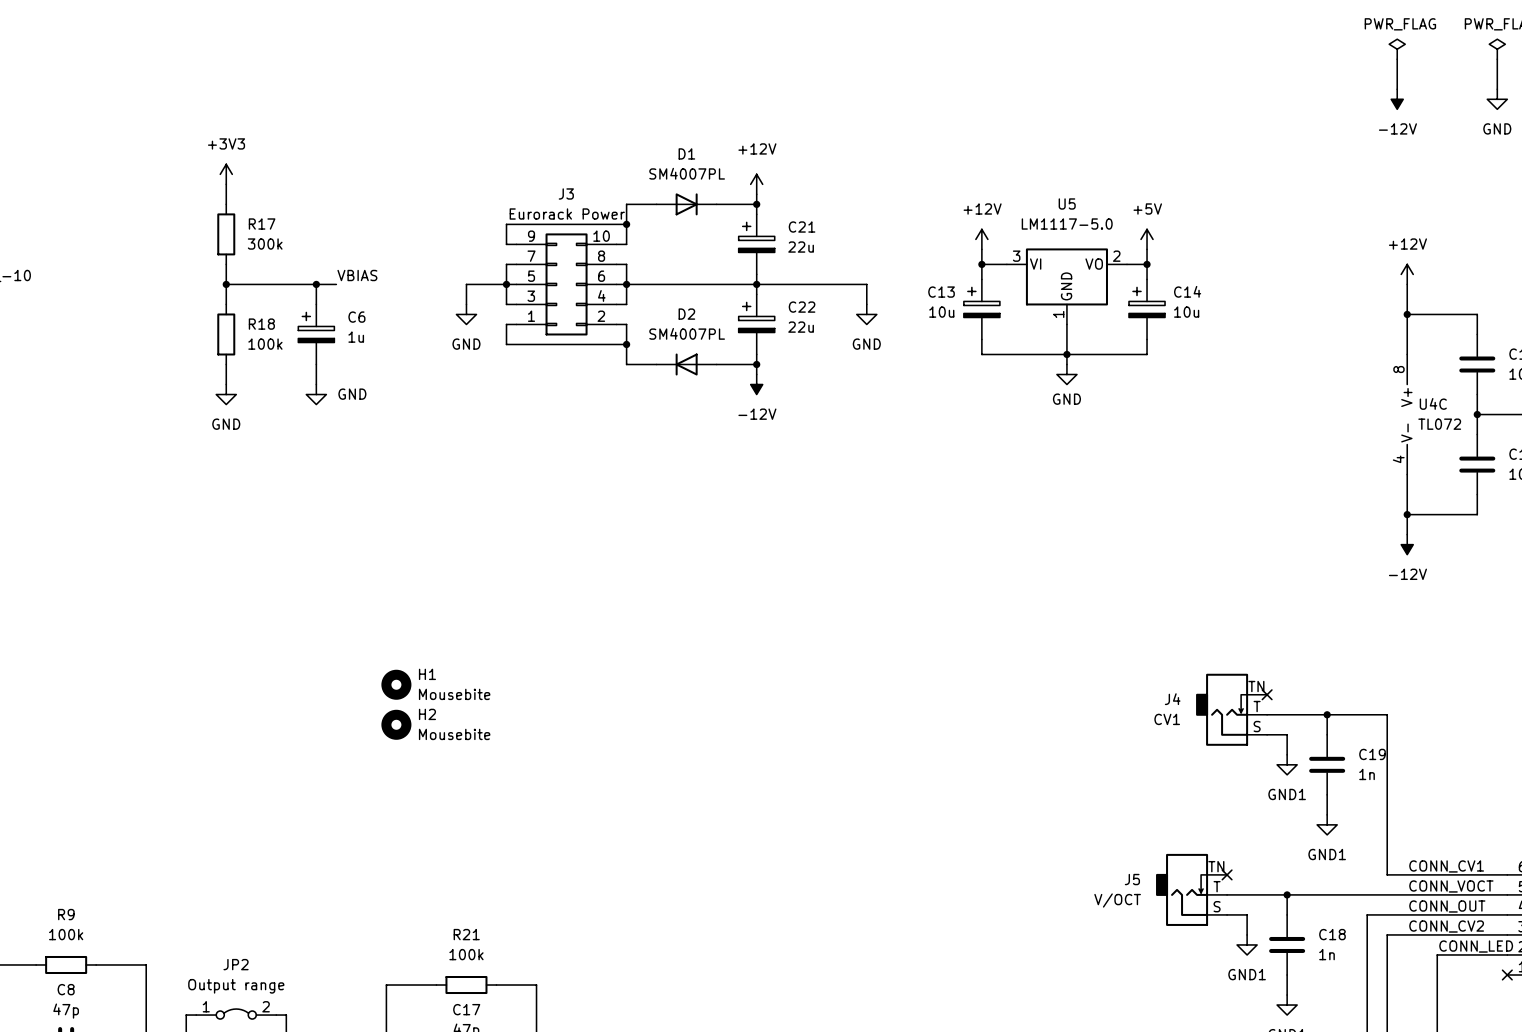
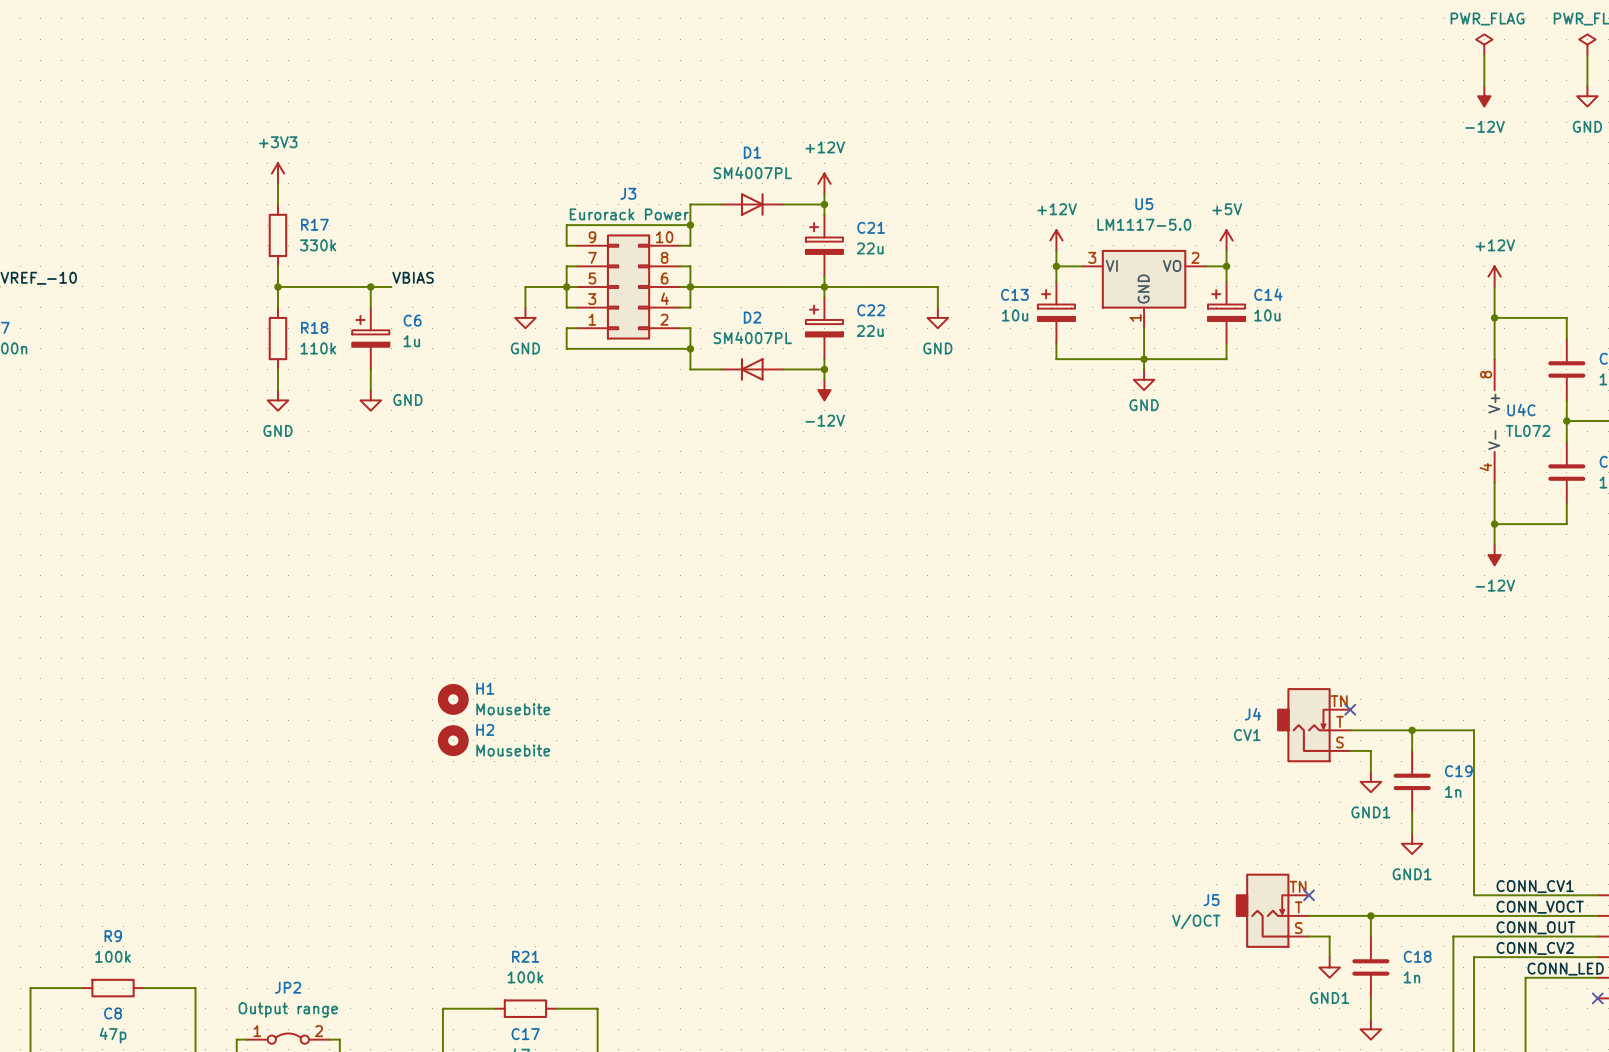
R17 value: 300k (265, 244) -> 330k (318, 245)
R18 value: 100k (265, 344) -> 110k (318, 348)

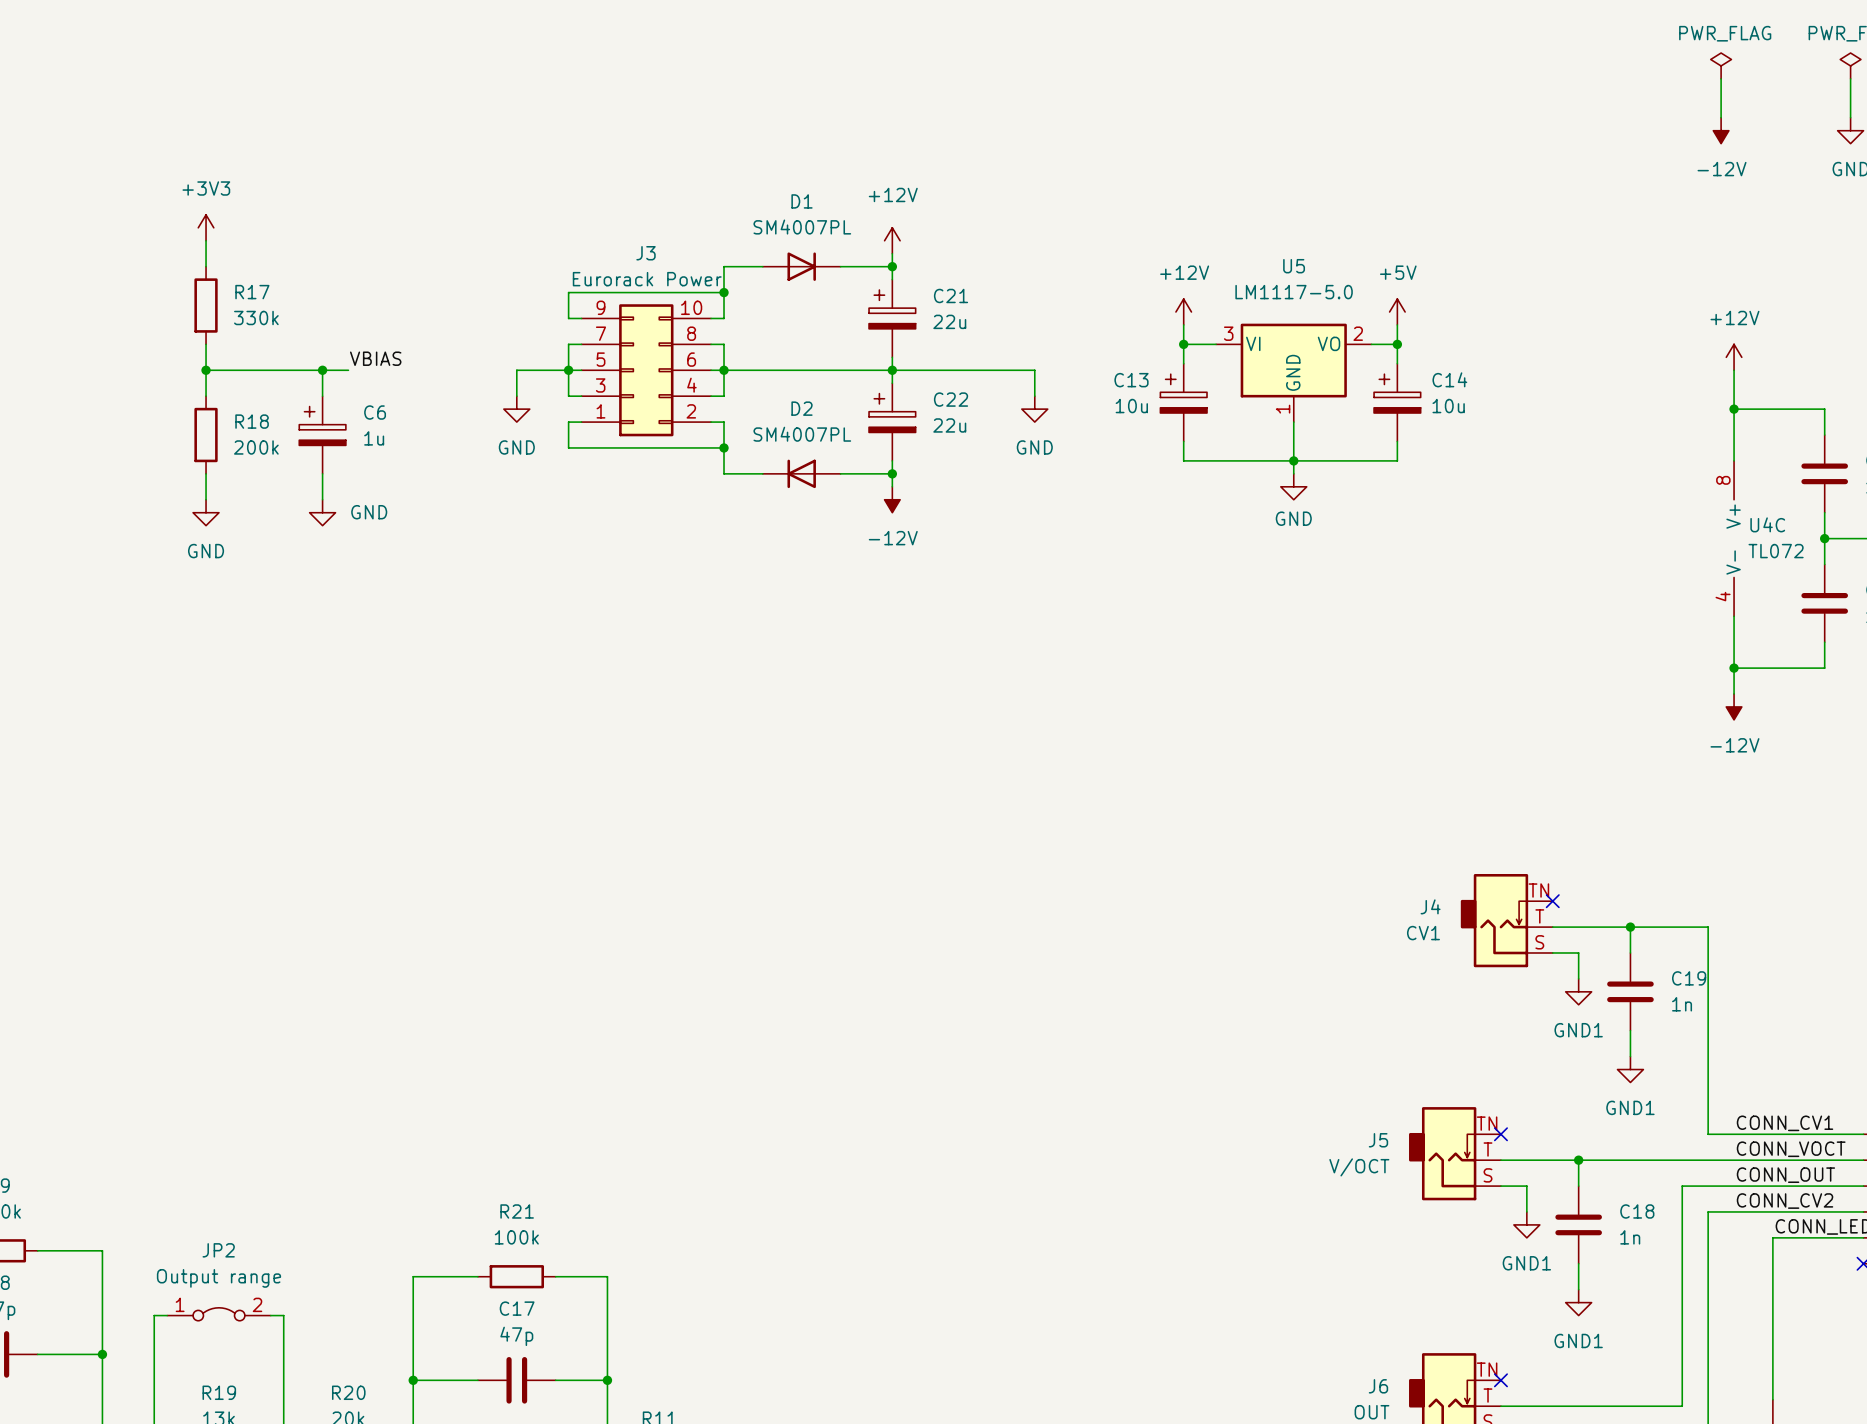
R18 value: 110k (318, 348) -> 200k (256, 447)
H1: Mousebite (453, 699) -> none
H2: Mousebite (453, 740) -> none

